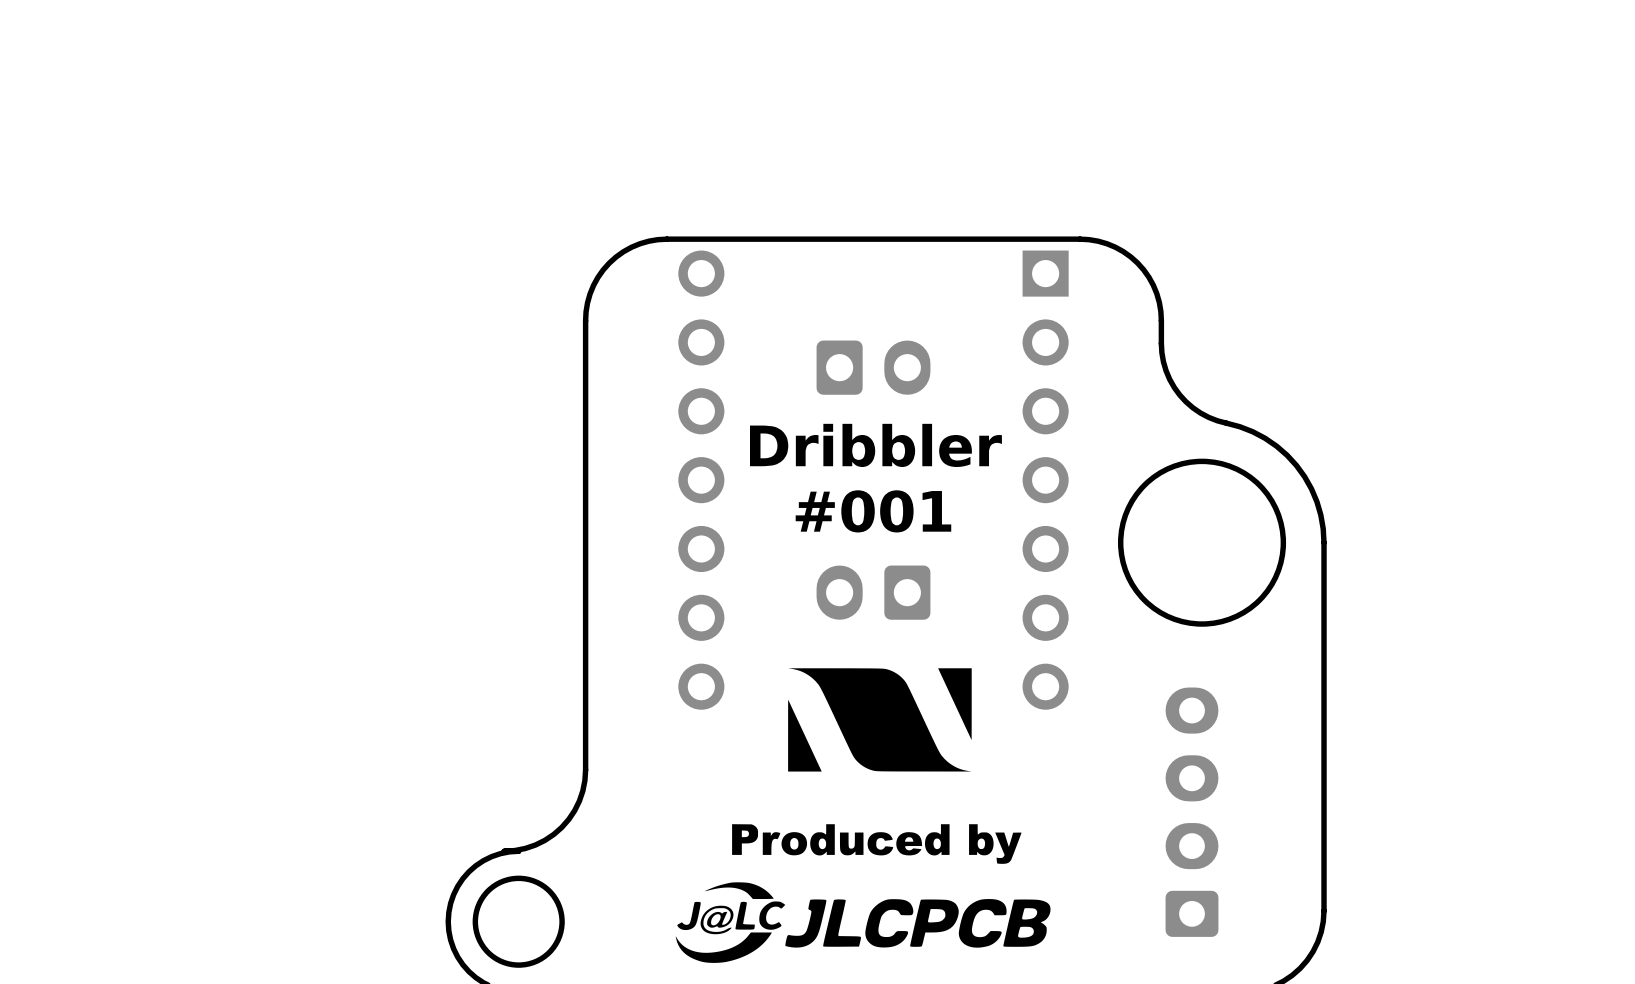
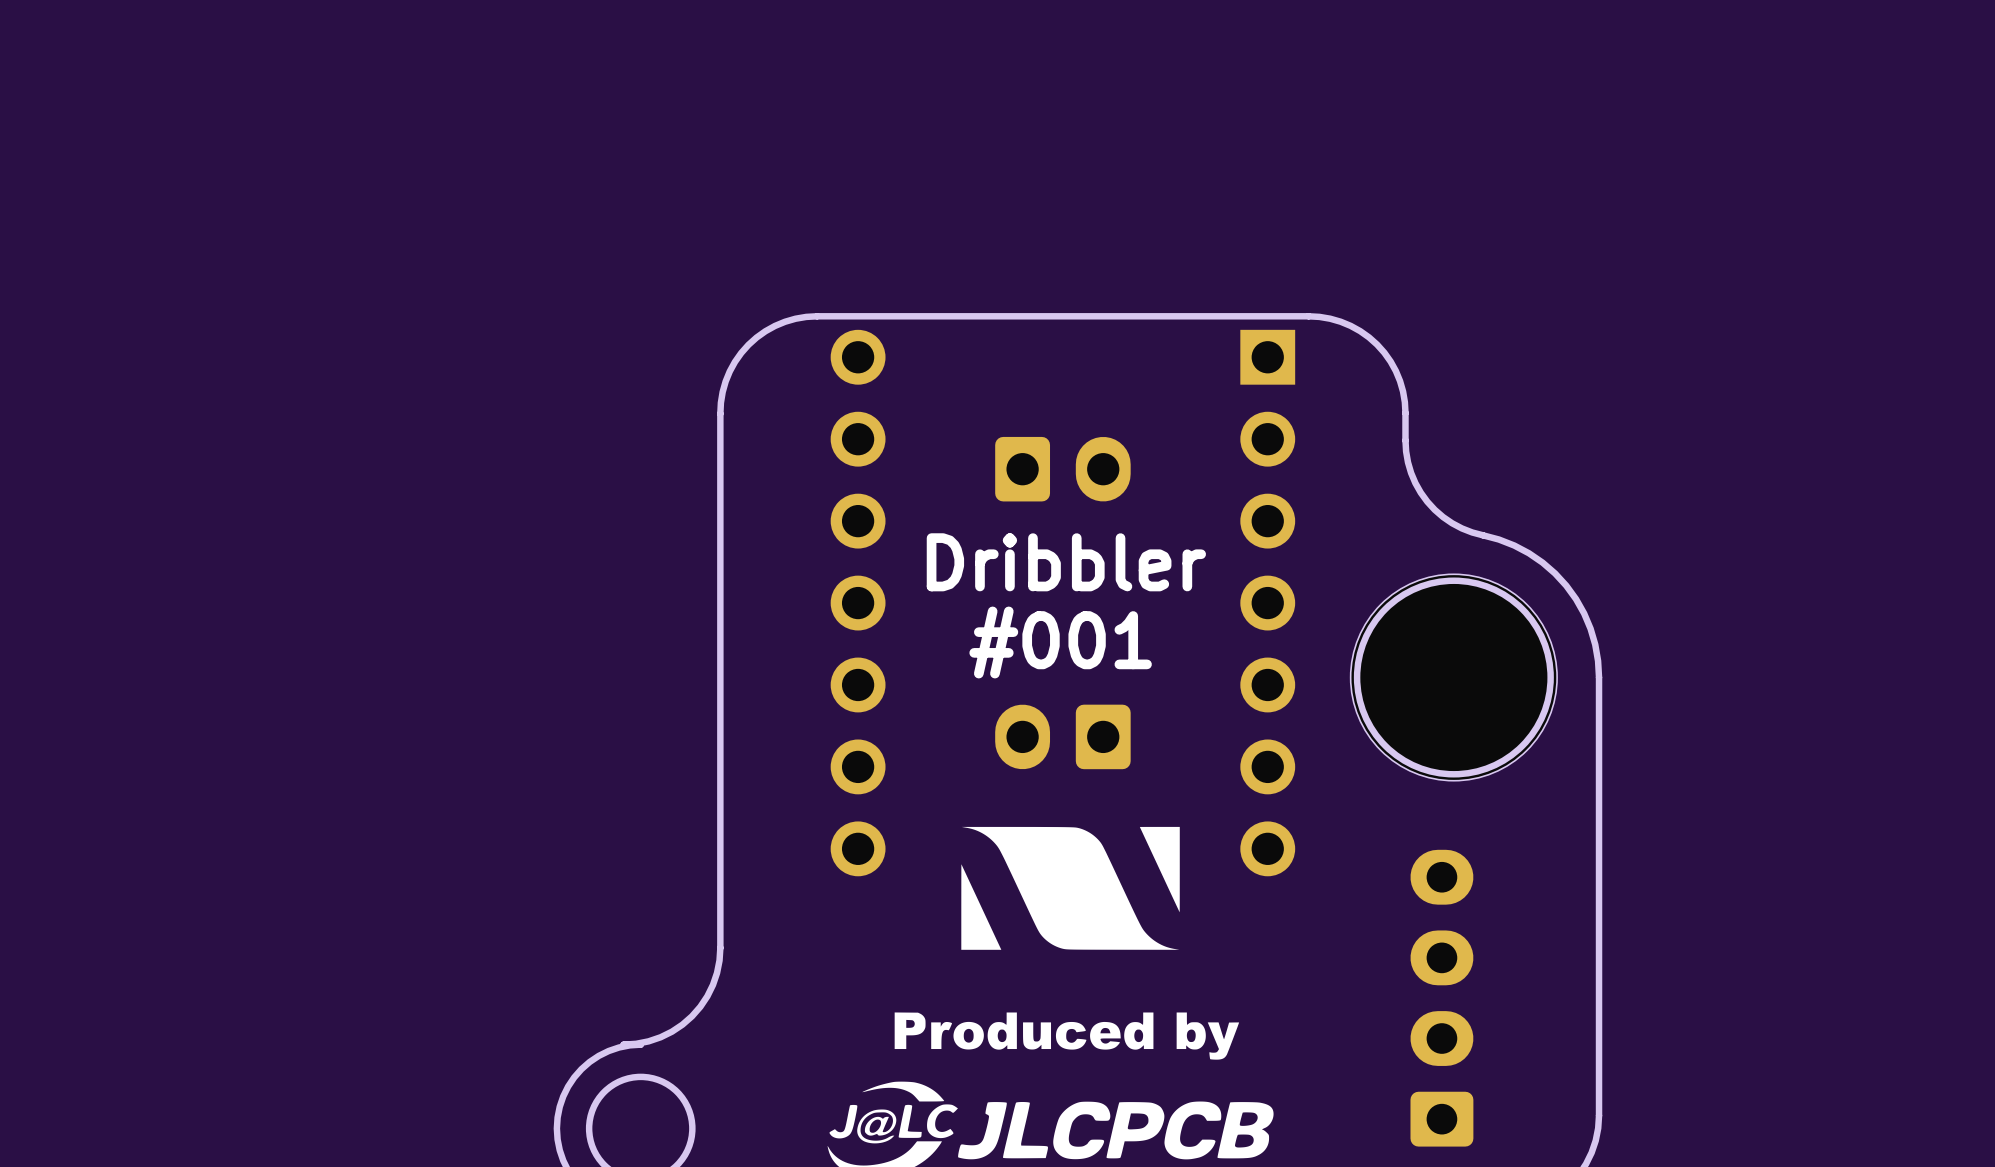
part: none -> (1453, 677)

